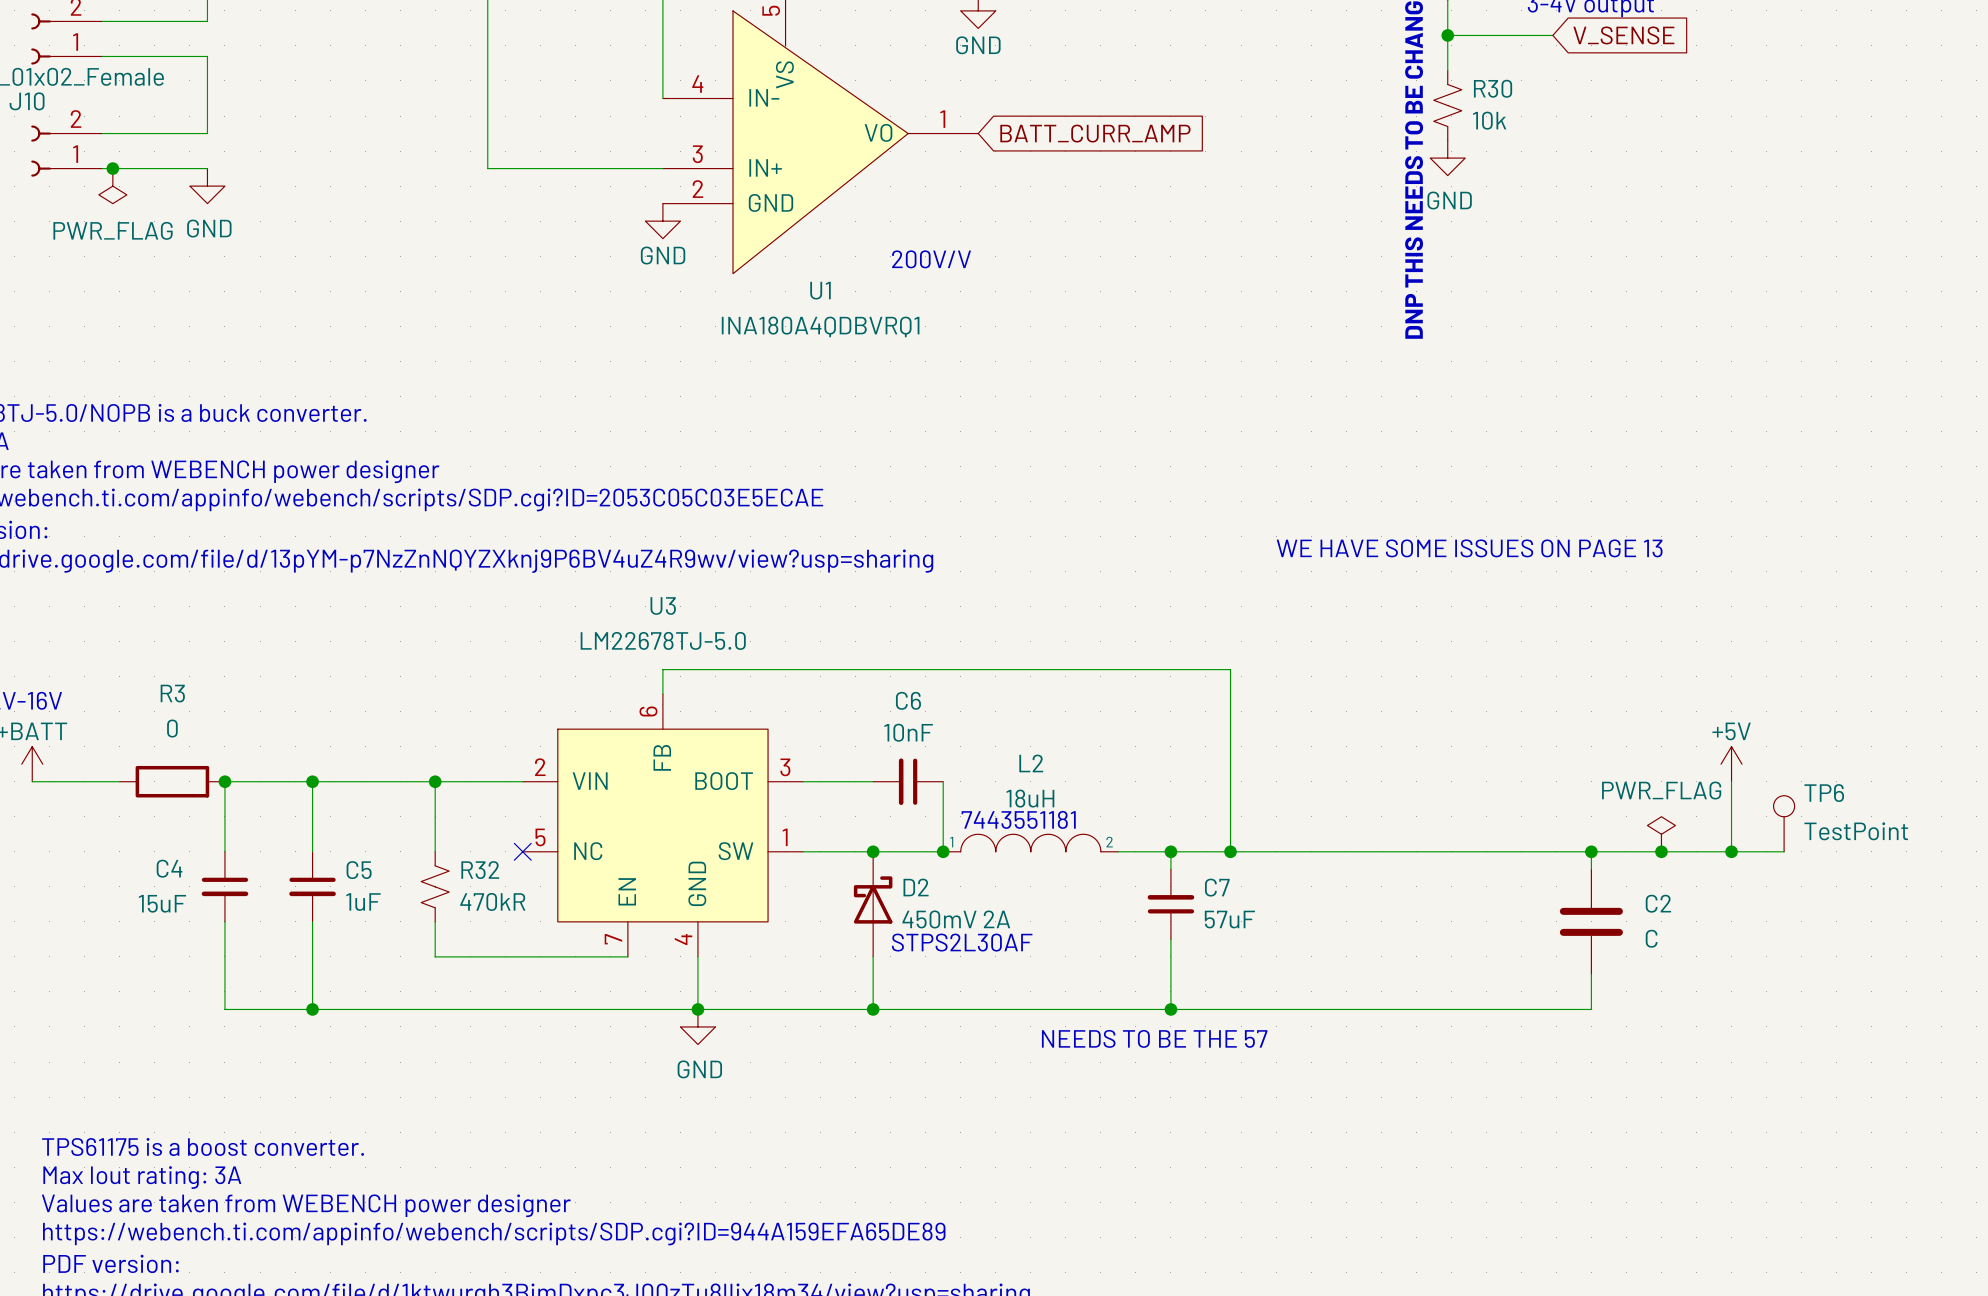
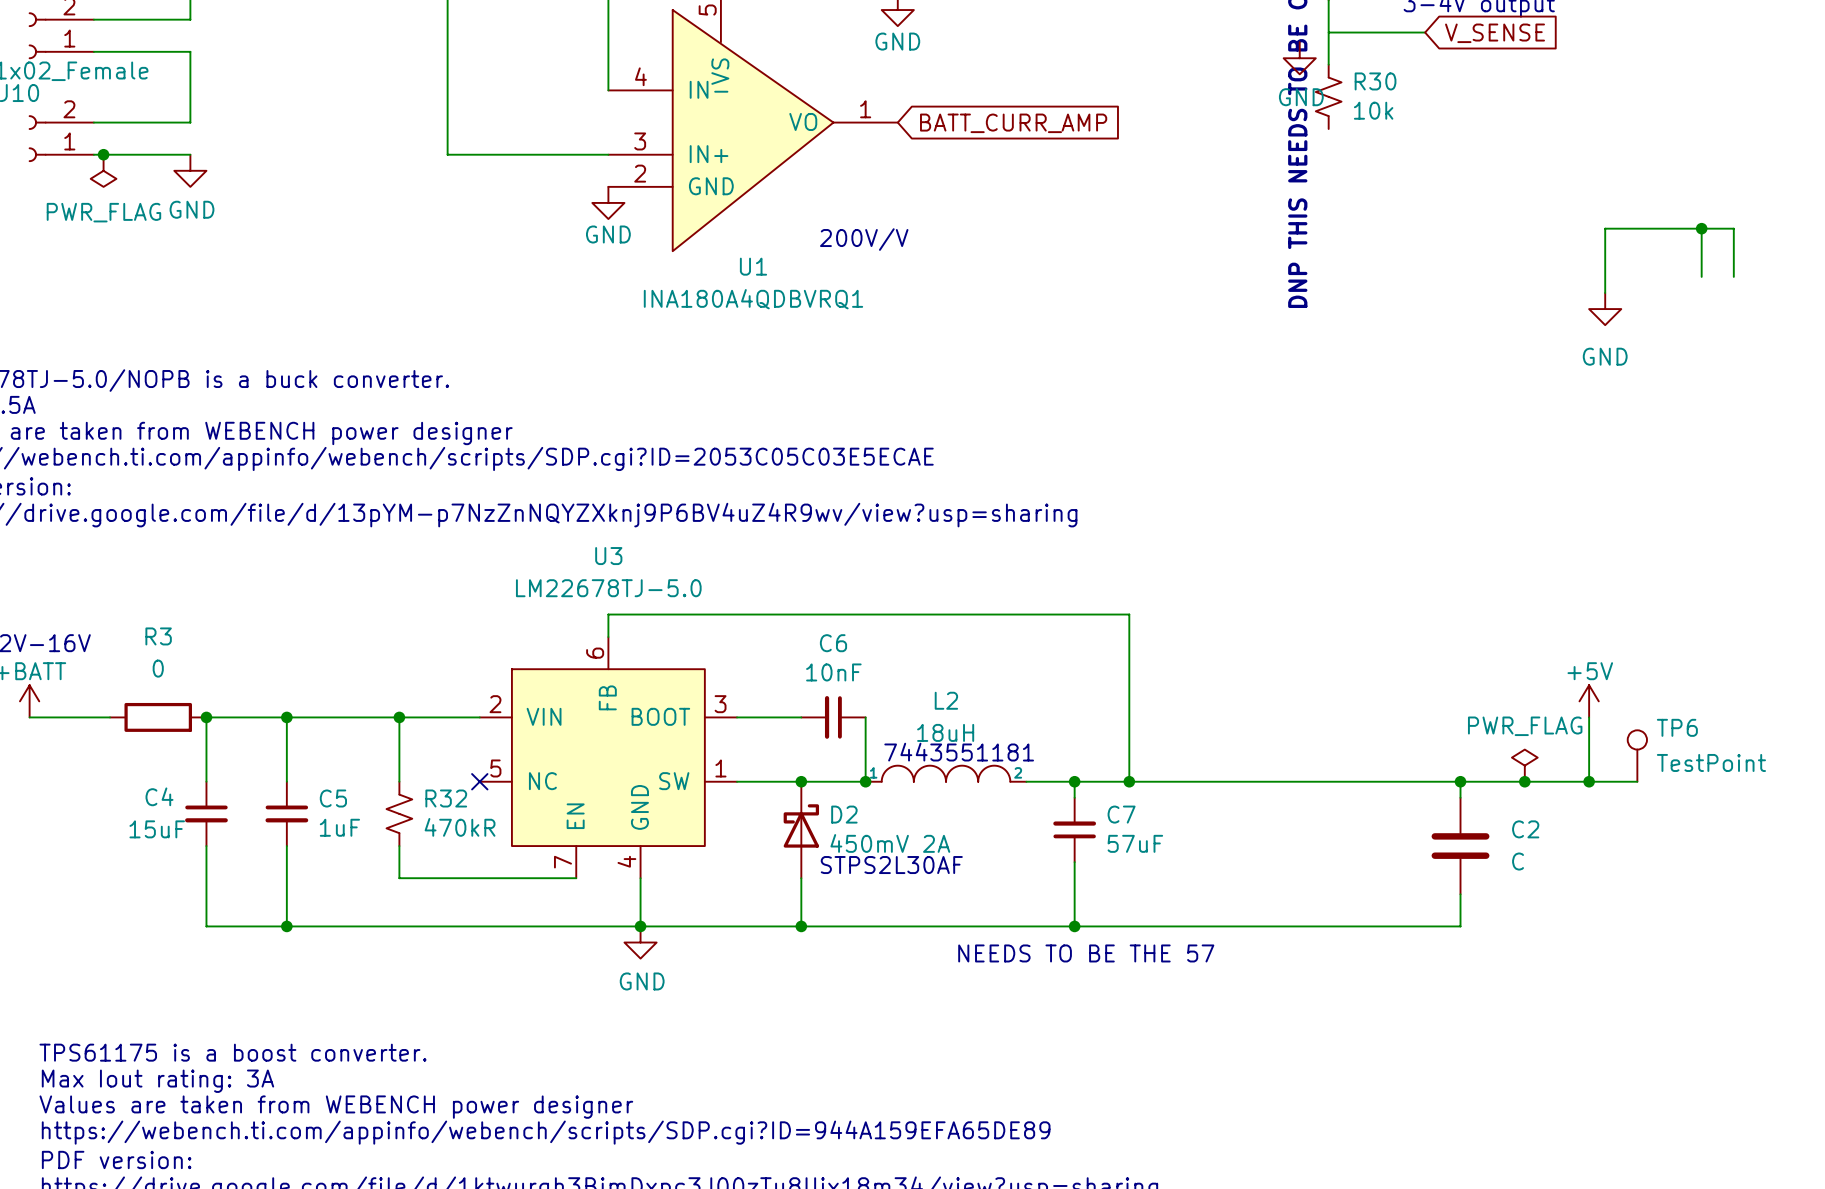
junction: (1447, 35) -> none
power symbol position: GND (1447, 158) -> GND (1299, 58)
wire: none -> (1701, 228) (1701, 276)
junction: none -> (1701, 228)
wire: none -> (1733, 276) (1733, 228) (1605, 228) (1605, 292)
power symbol: none -> GND (1605, 309)
text: WE HAVE SOME ISSUES ON PAGE 13 (1469, 548) -> none

